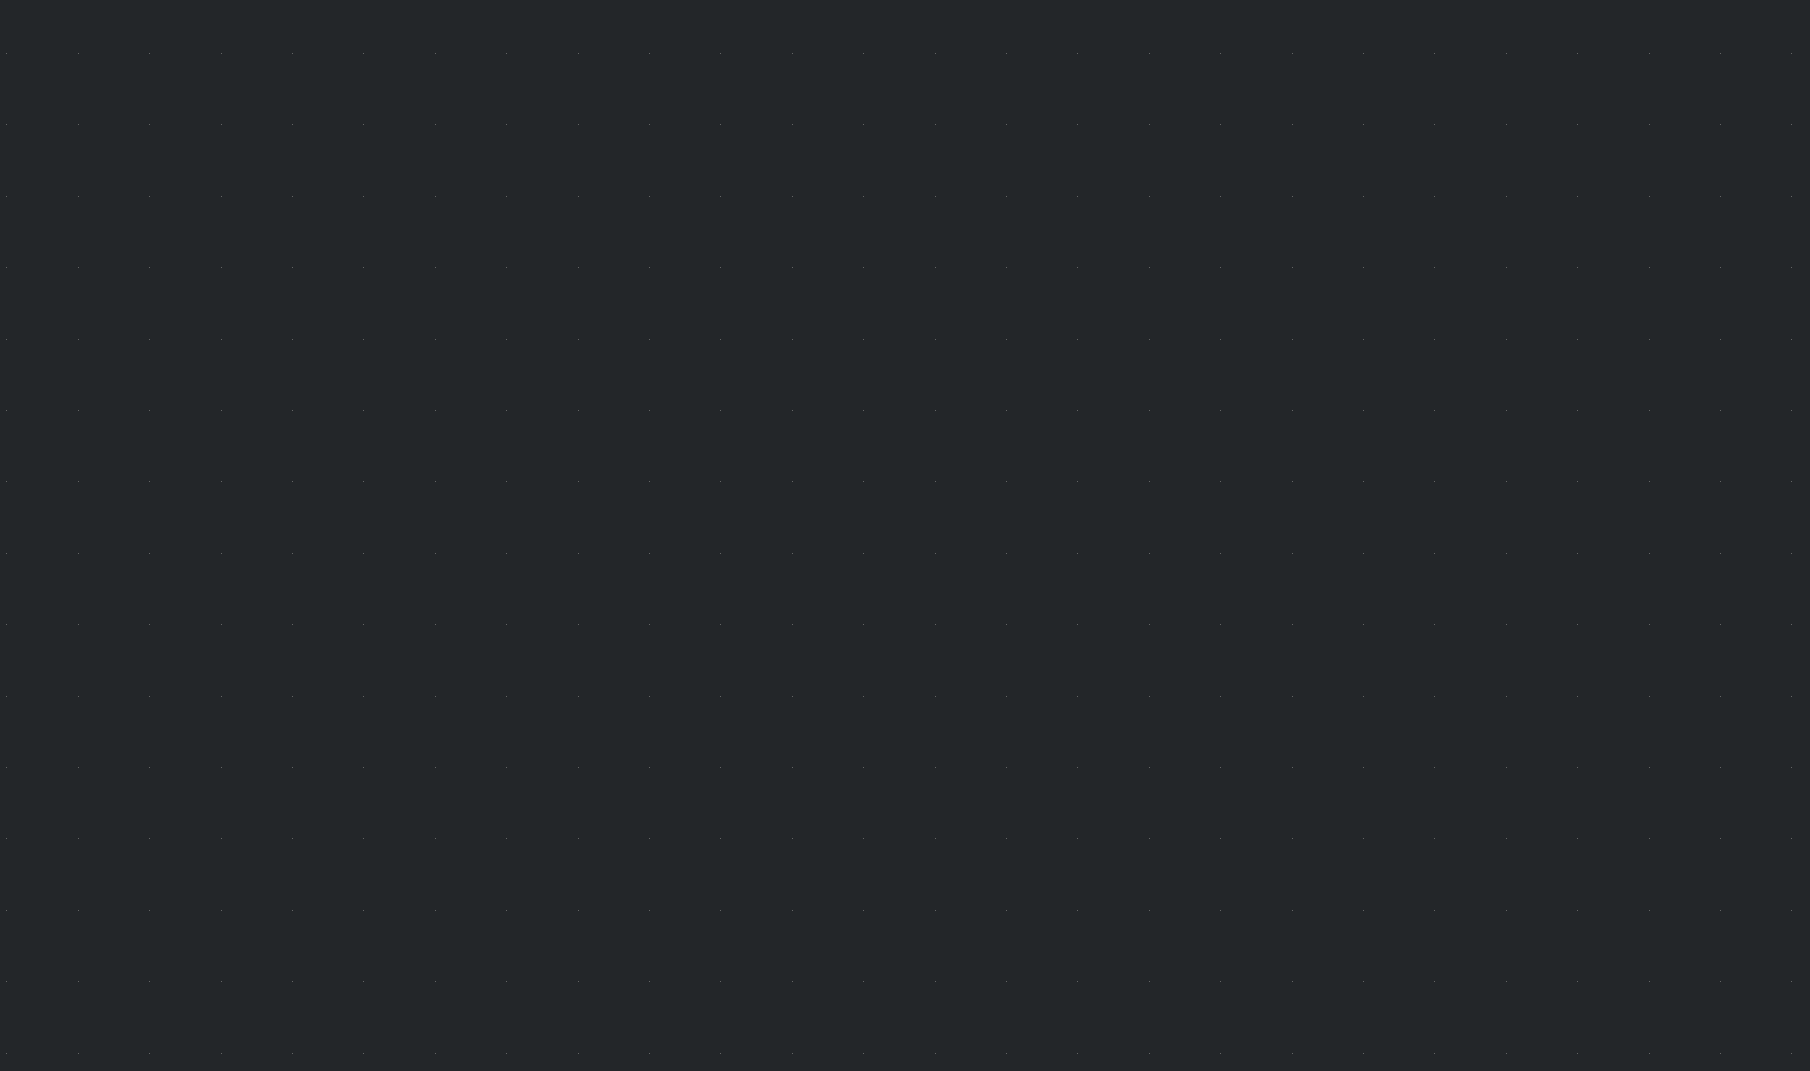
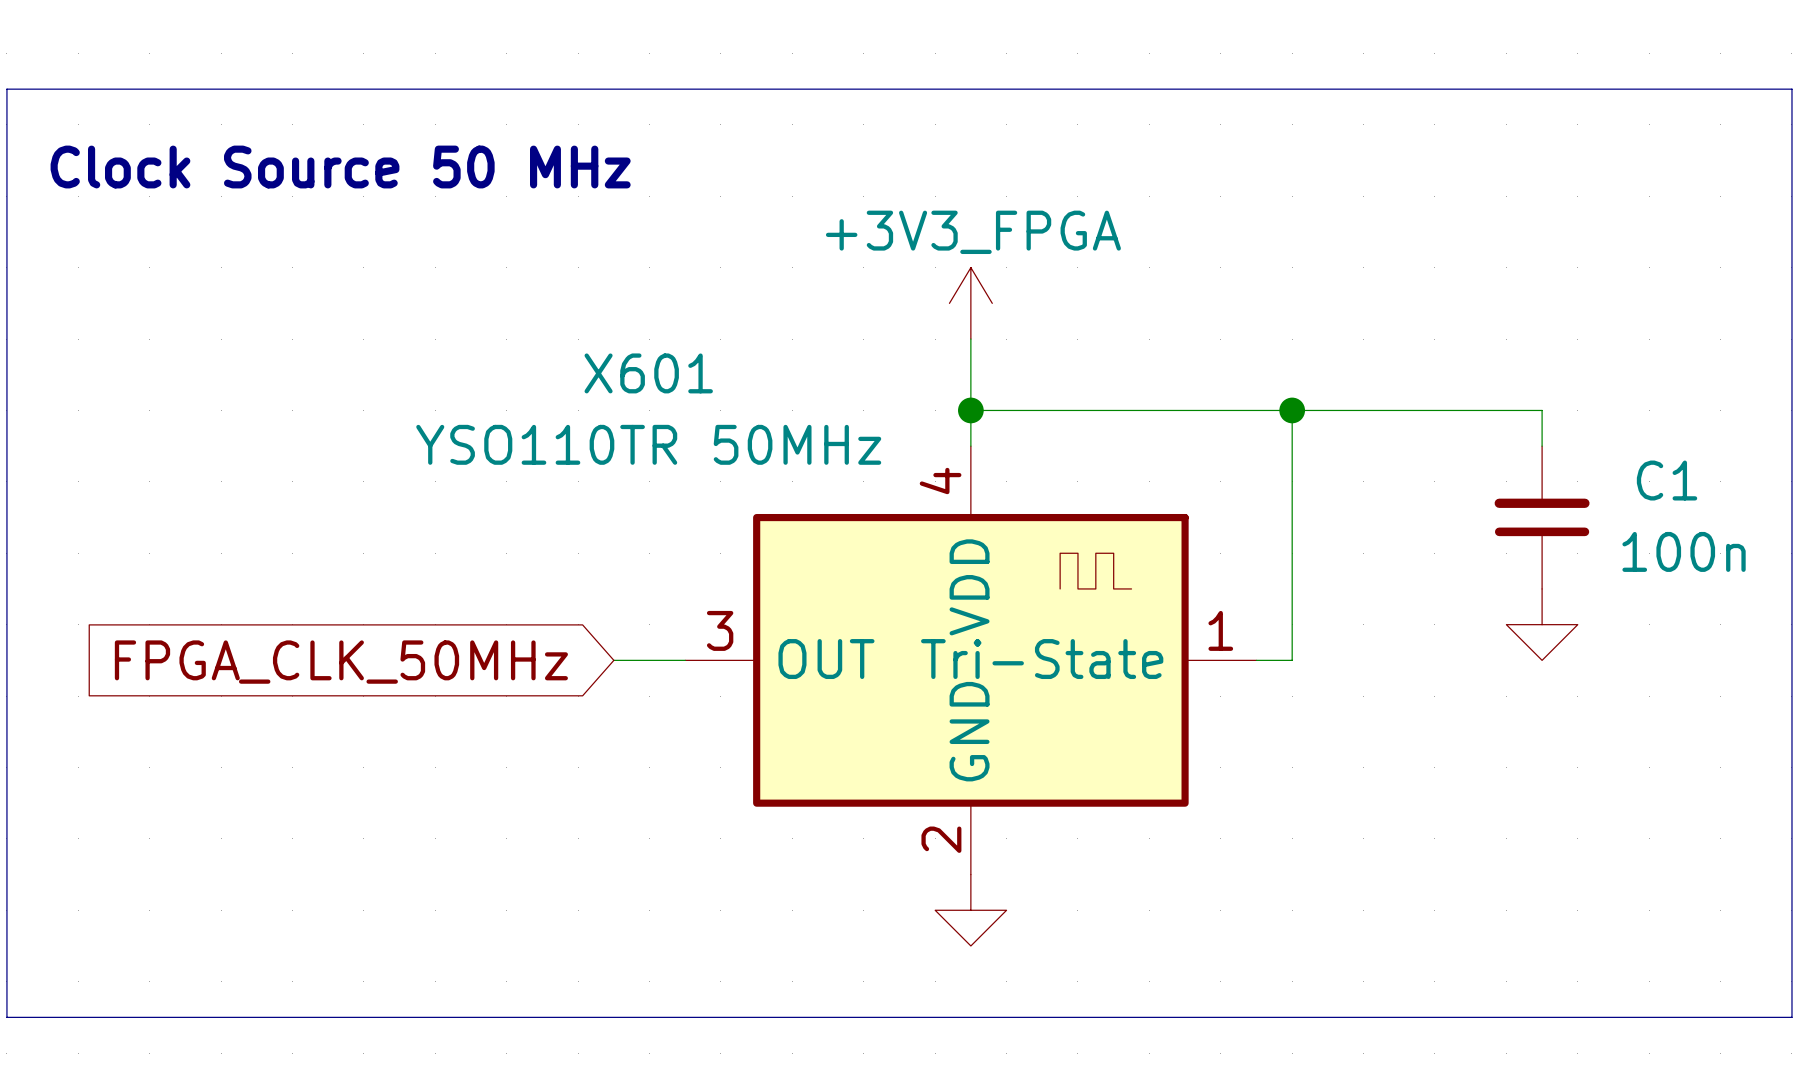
line: none -> (6, 89) (1791, 89) (1791, 1017) (6, 1017) (6, 89)
text: none -> Clock Source 50 MHz (340, 167)
power symbol: none -> +3V3_FPGA (970, 303)
wire: none -> (970, 339) (970, 446)
wire: none -> (970, 410) (1542, 410) (1542, 446)
junction: none -> (970, 410)
wire: none -> (1292, 410) (1292, 660) (1256, 660)
junction: none -> (1292, 410)
C1: none -> 100n (1542, 517)
power symbol: none -> (1542, 624)
wire: none -> (613, 660) (685, 660)
X601: none -> YSO110TR 50MHz (970, 660)
global label: none -> FPGA_CLK_50MHz (341, 662)
power symbol: none -> (970, 910)

